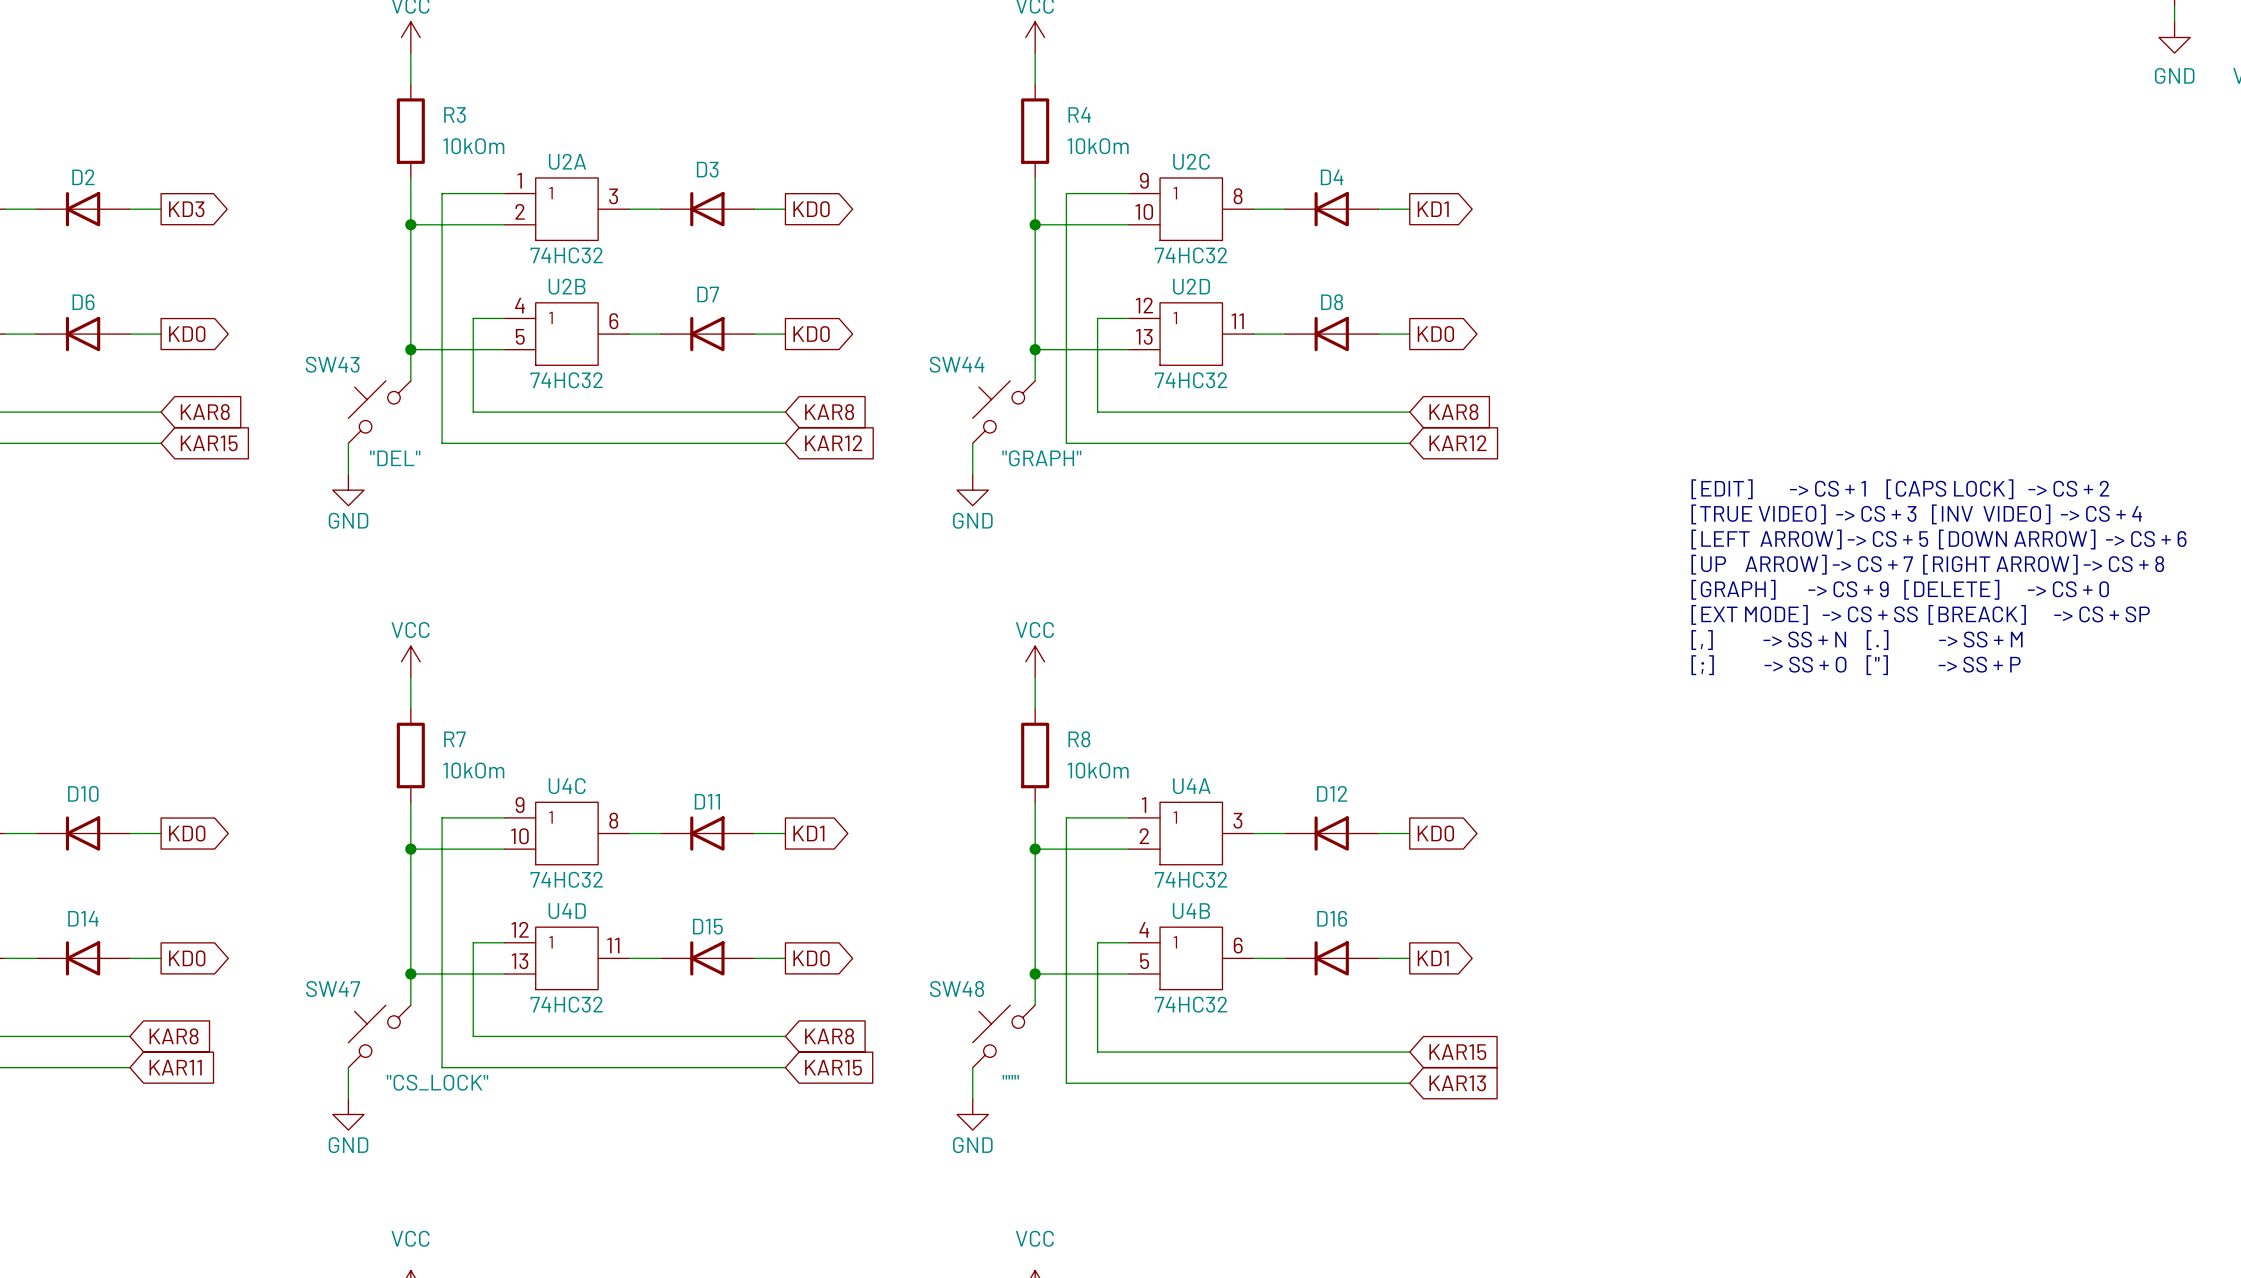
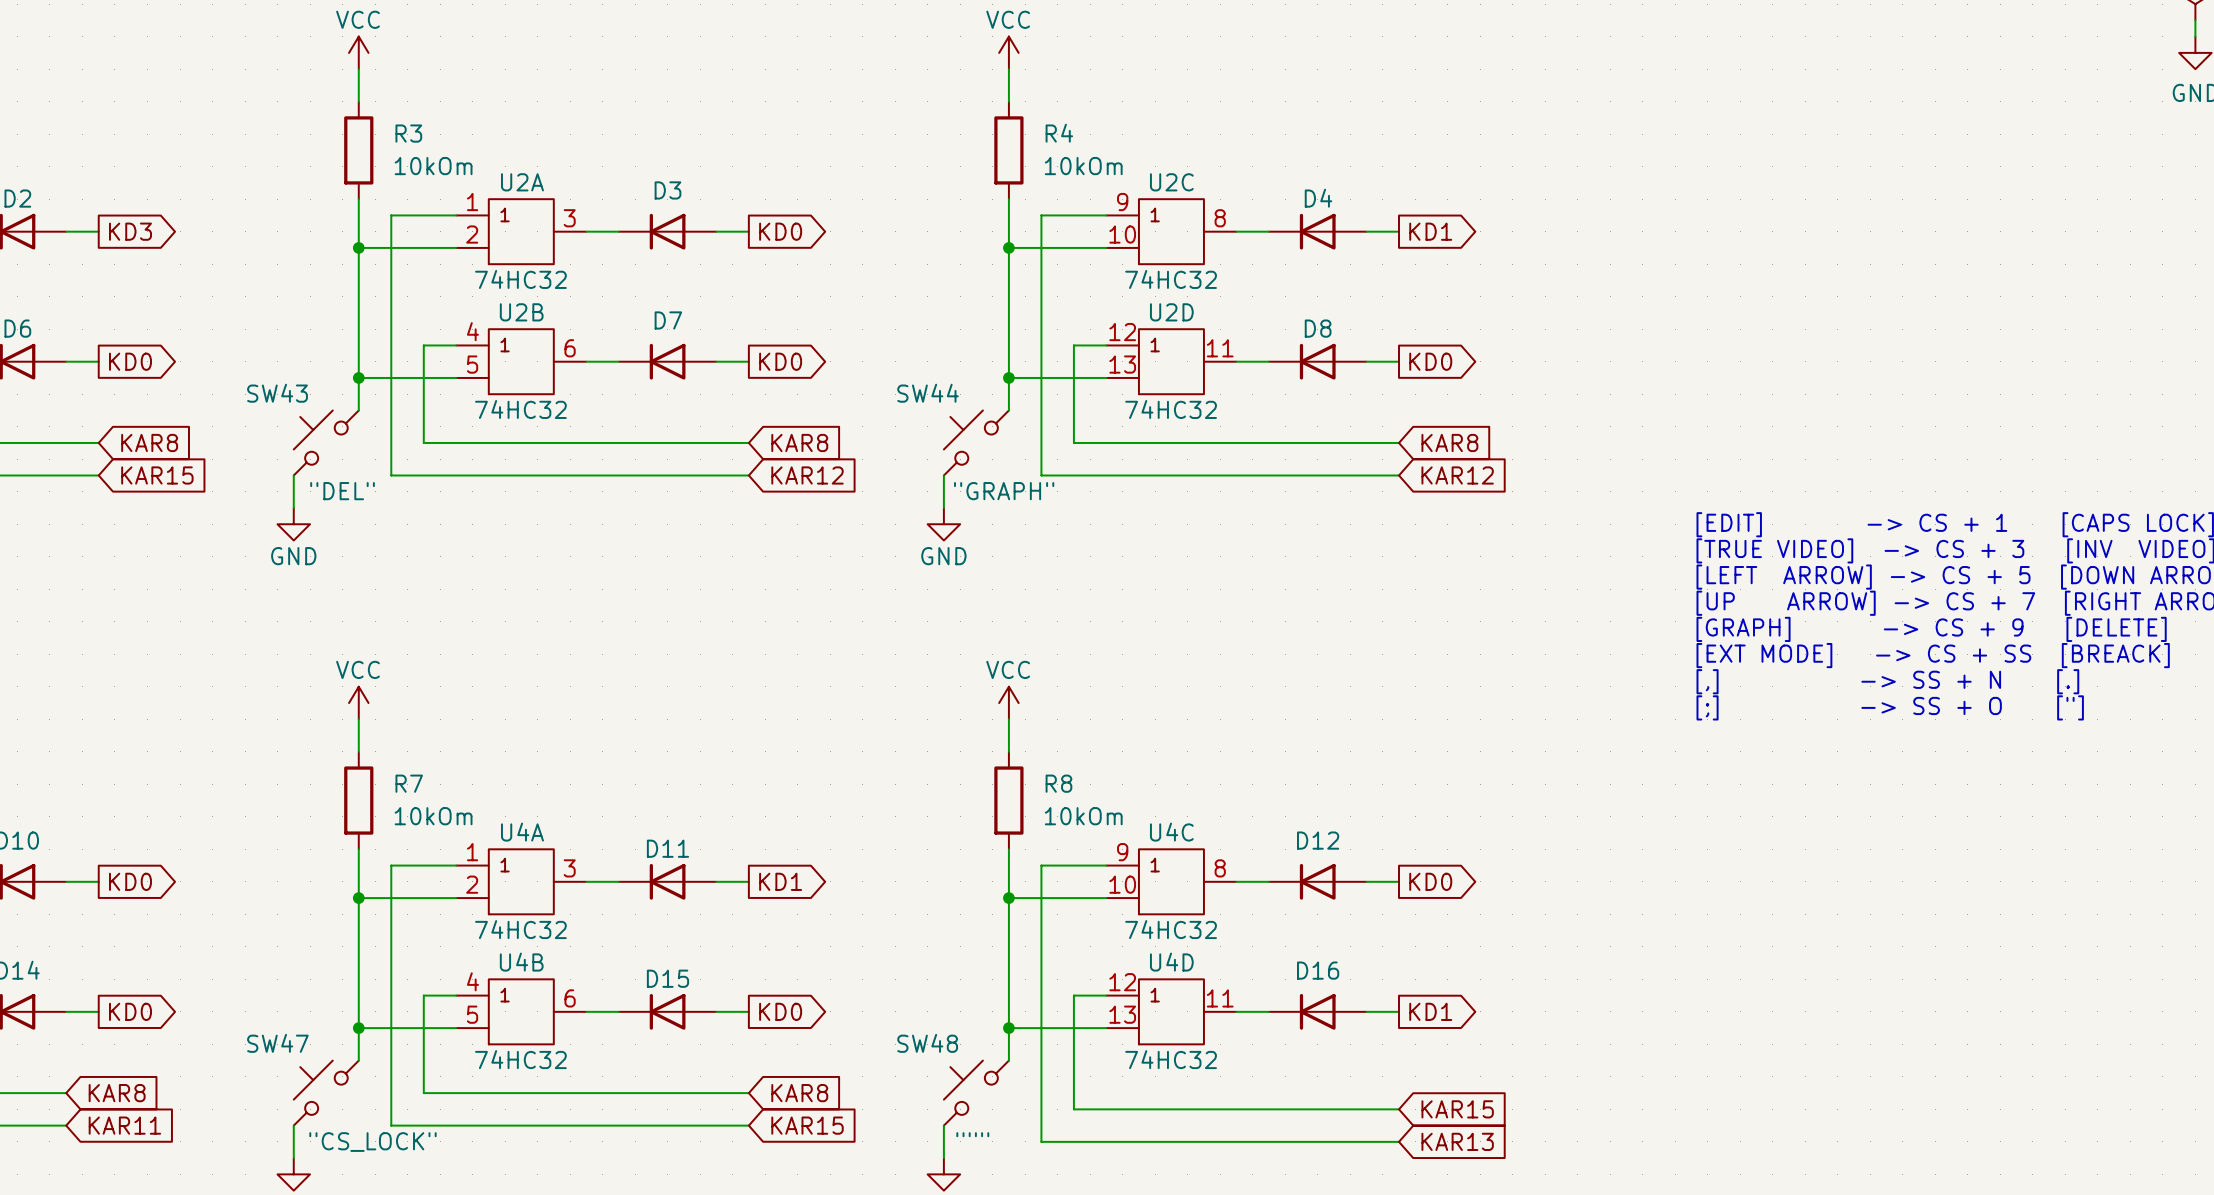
U4C position: (566, 833) -> (1171, 881)
U4A position: (1191, 833) -> (521, 881)
U4D position: (566, 958) -> (1171, 1011)
U4B position: (1191, 958) -> (521, 1011)

